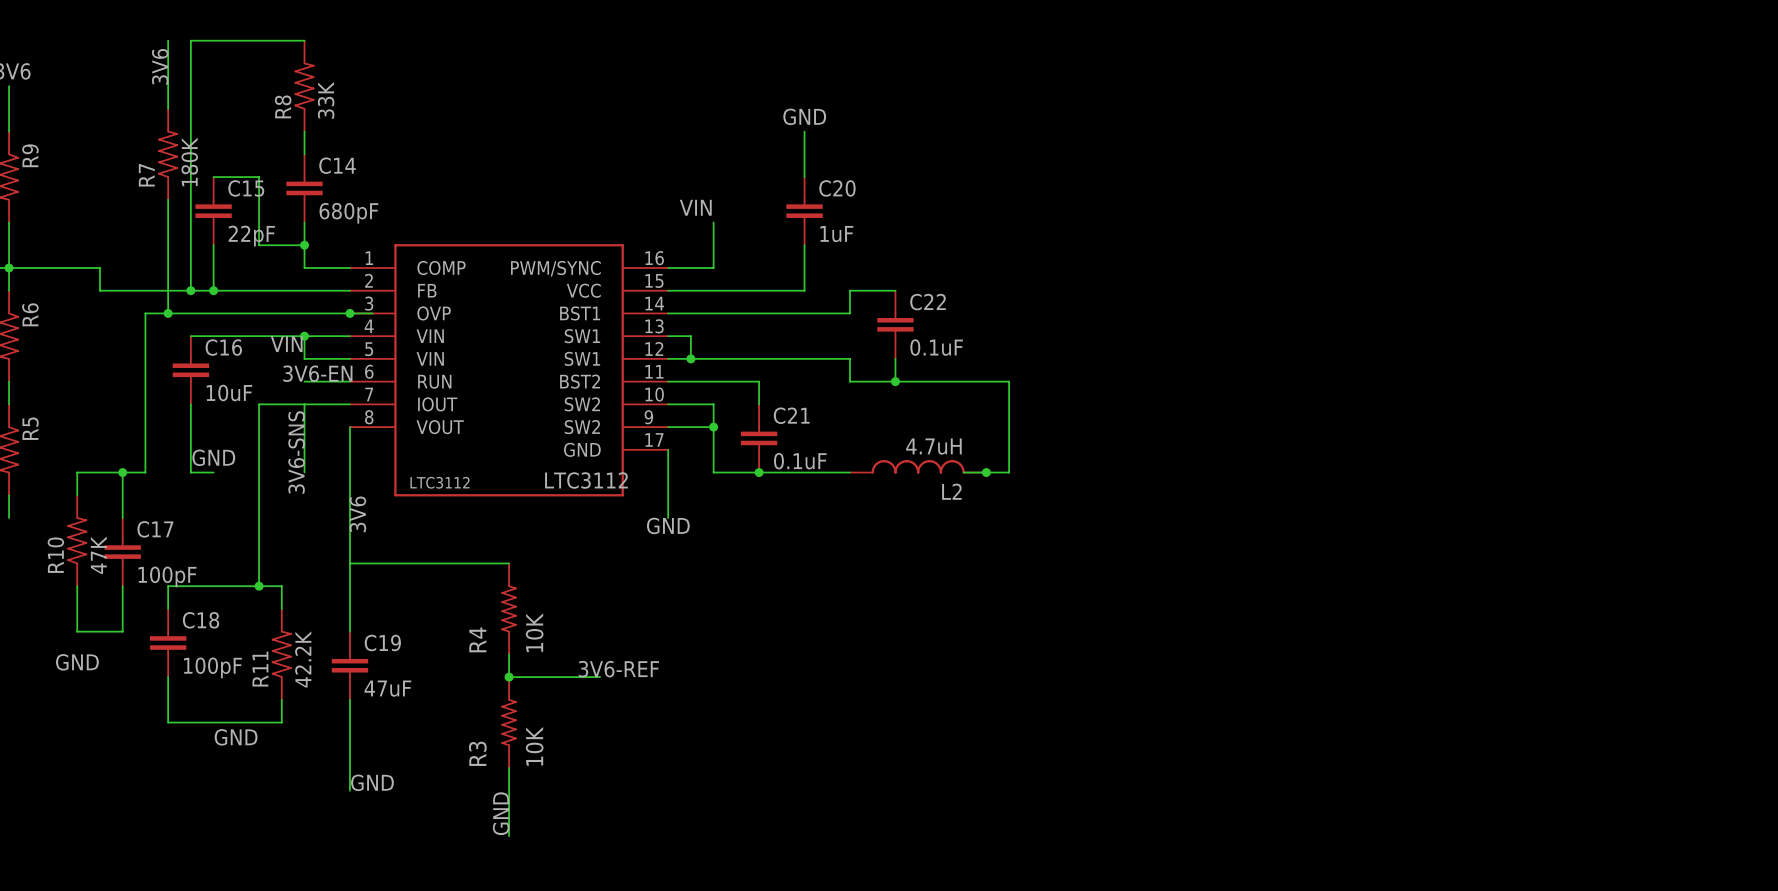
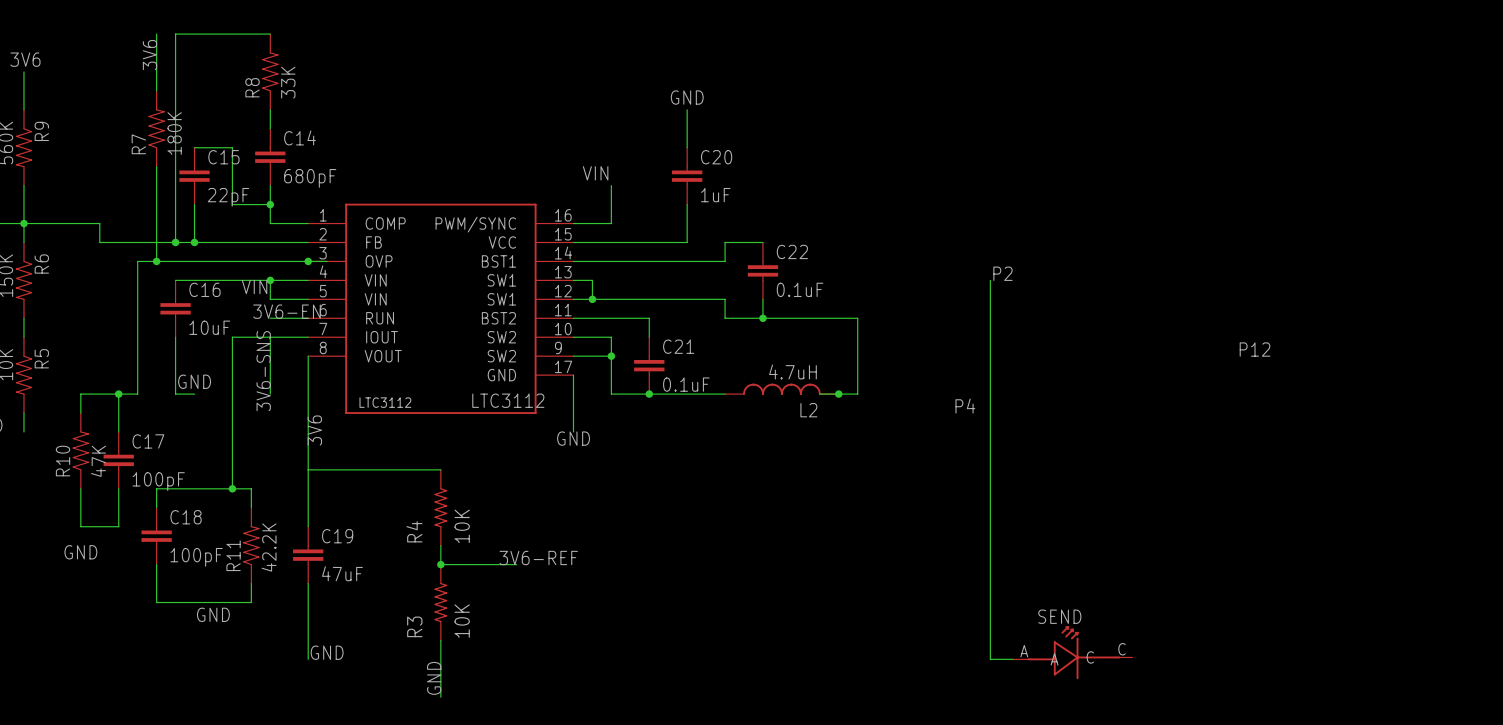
label: none -> P2 (1002, 273)
wire: none -> (990, 280) (990, 659) (1013, 659)
label: none -> P12 (1255, 349)
label: none -> P4 (965, 406)
SEND: none -> (1072, 652)

